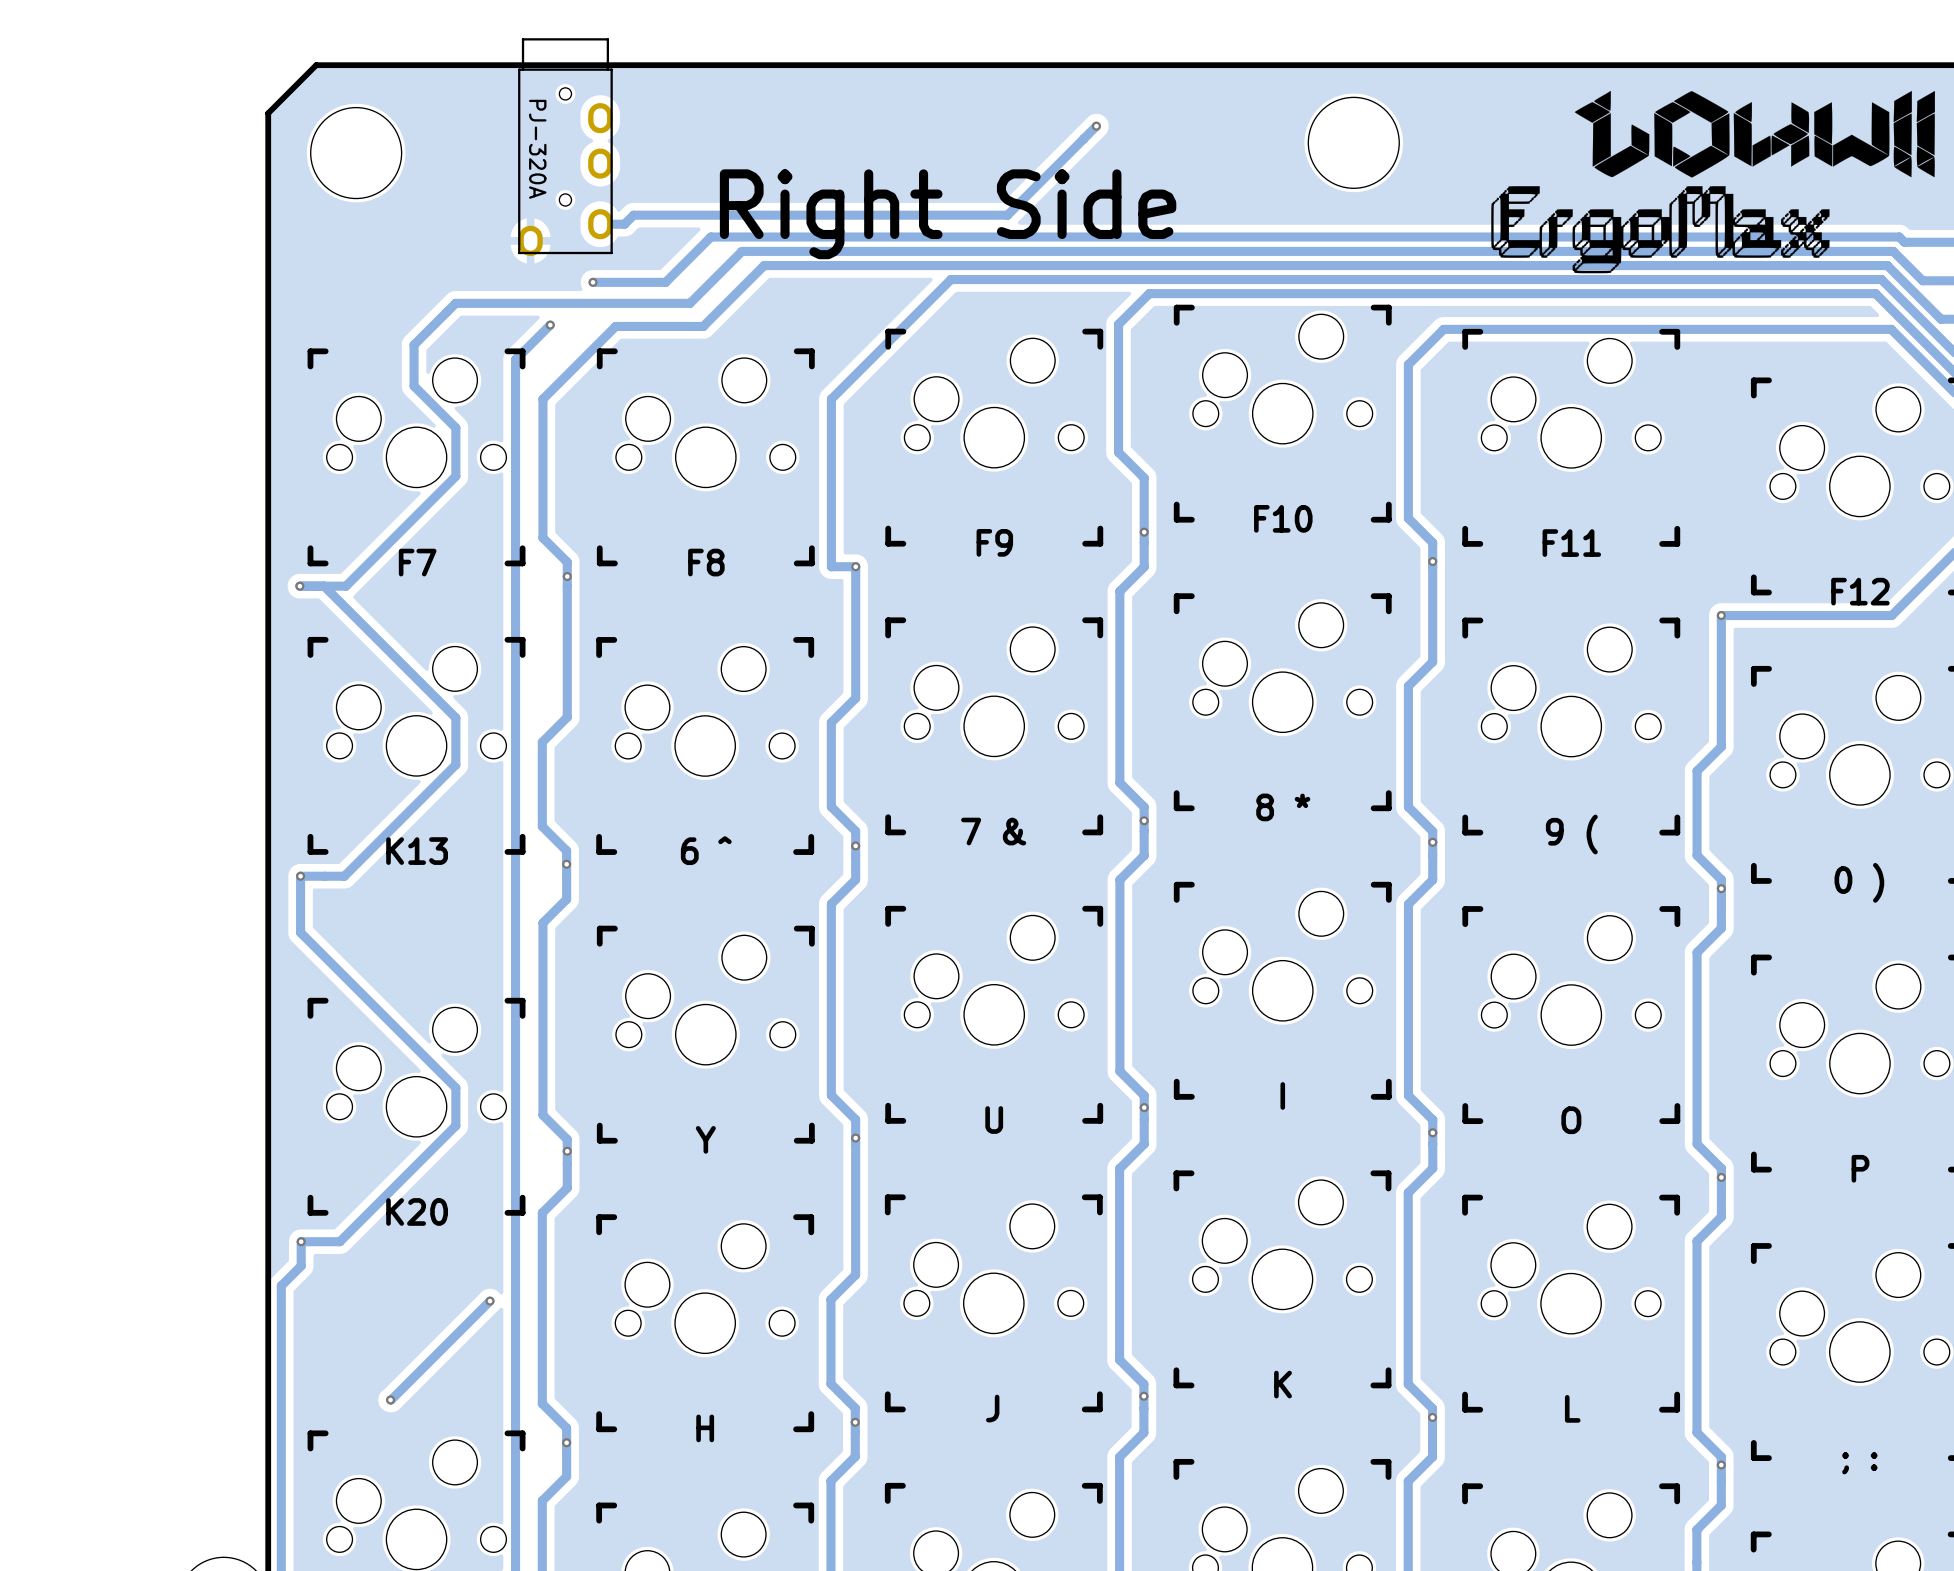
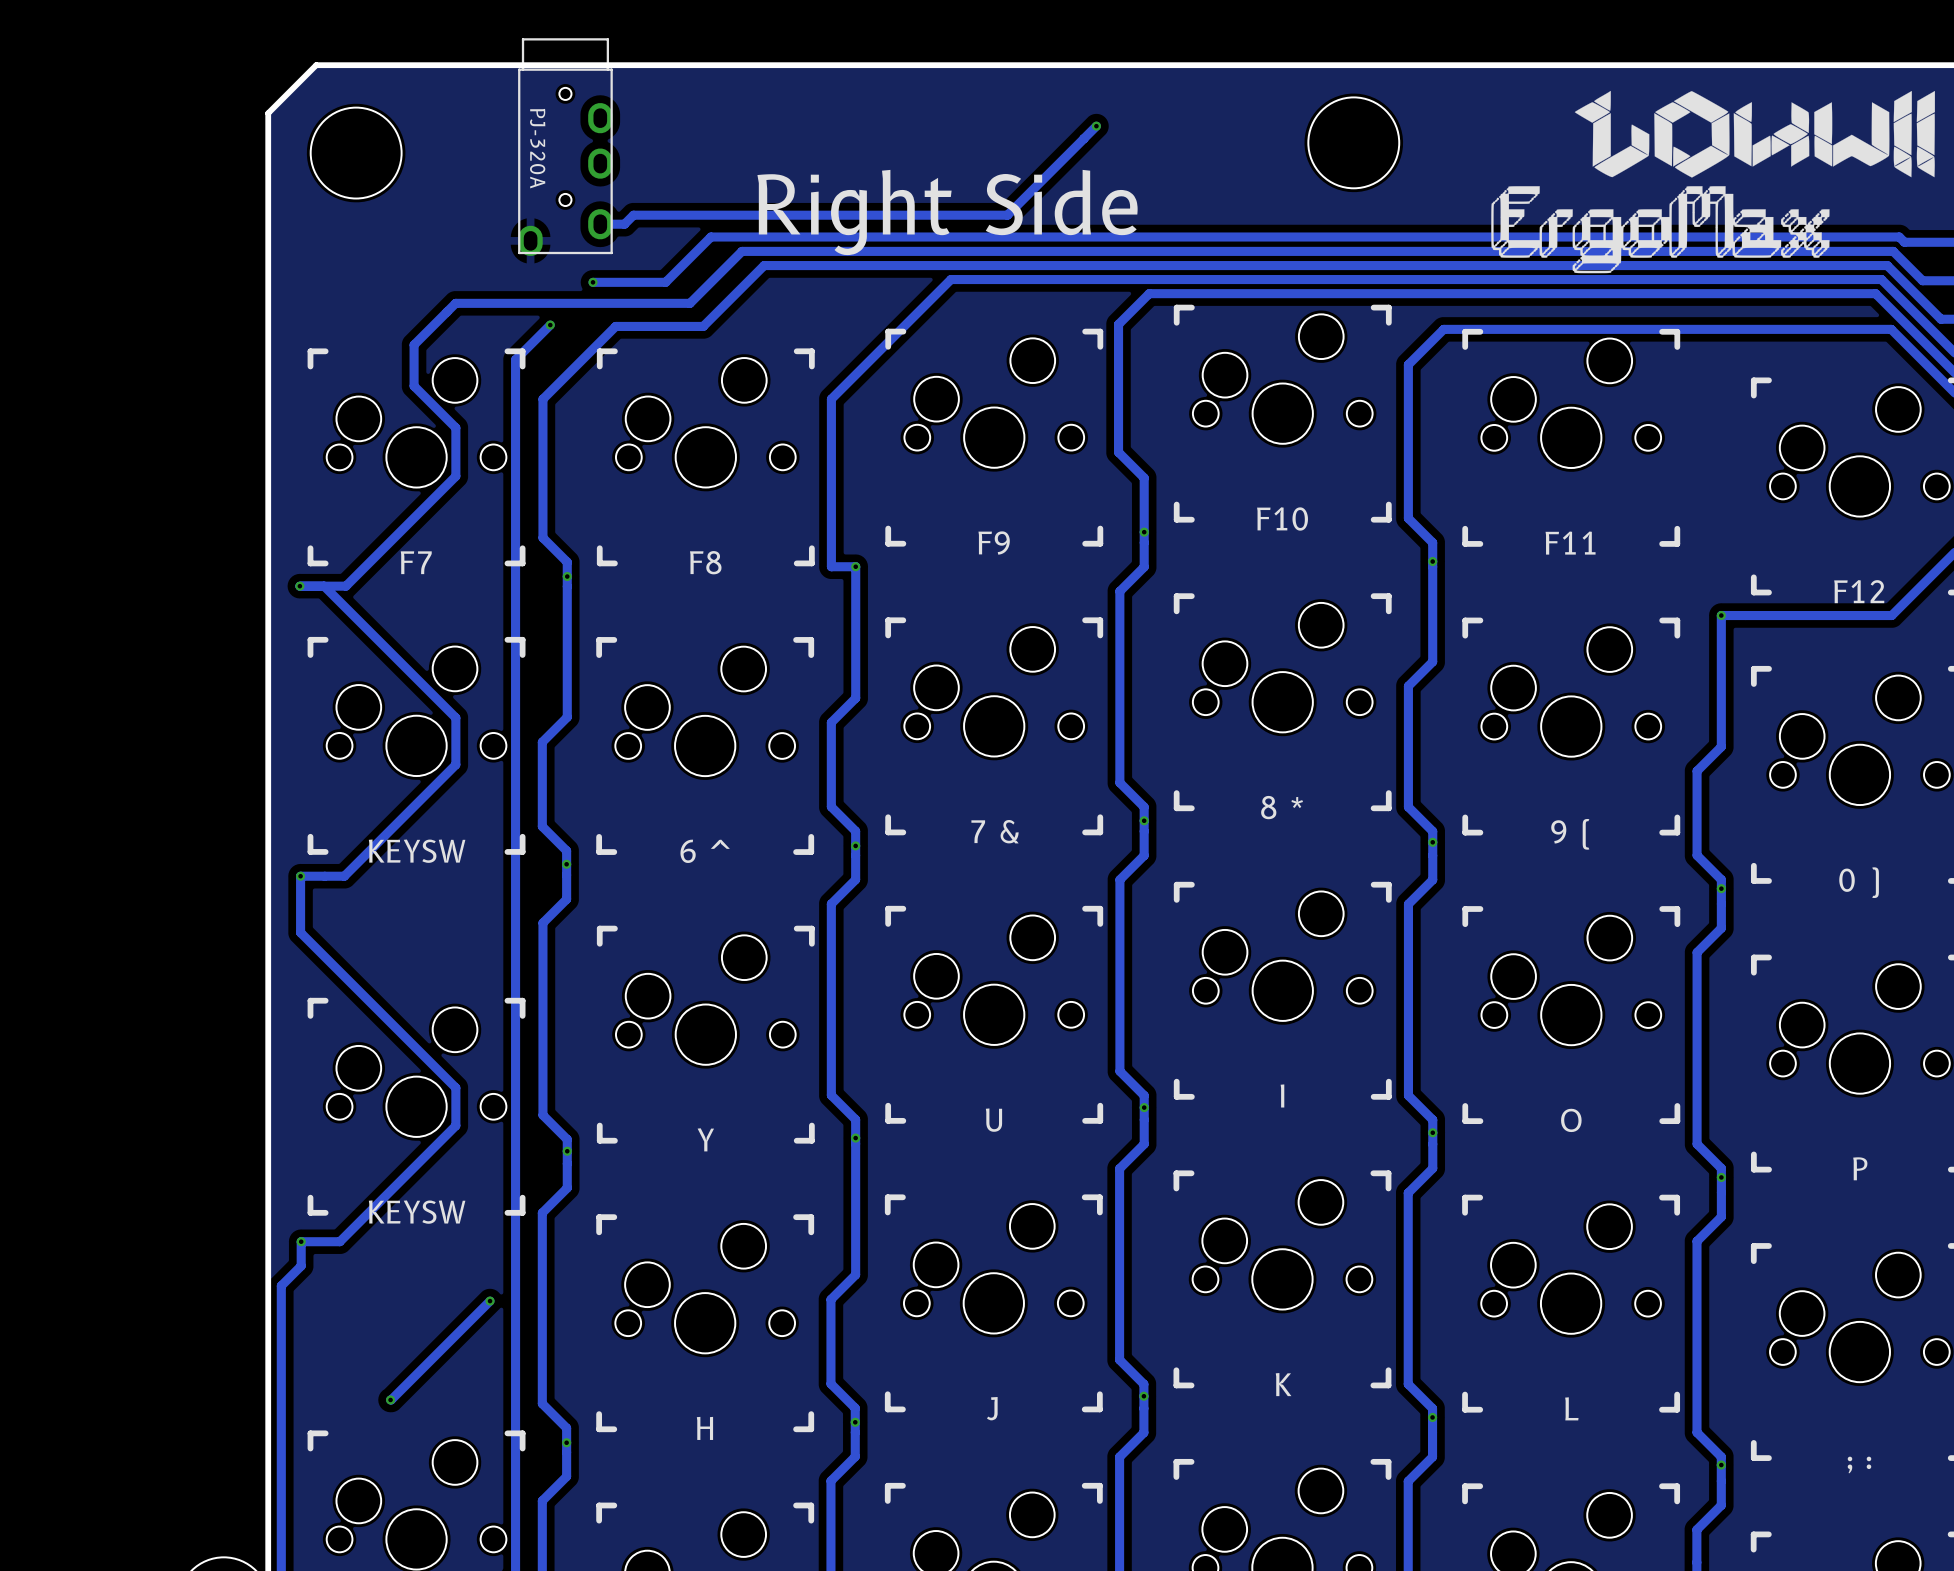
part value: K13 (417, 851) -> KEYSW (417, 851)
part value: K20 (417, 1211) -> KEYSW (417, 1212)

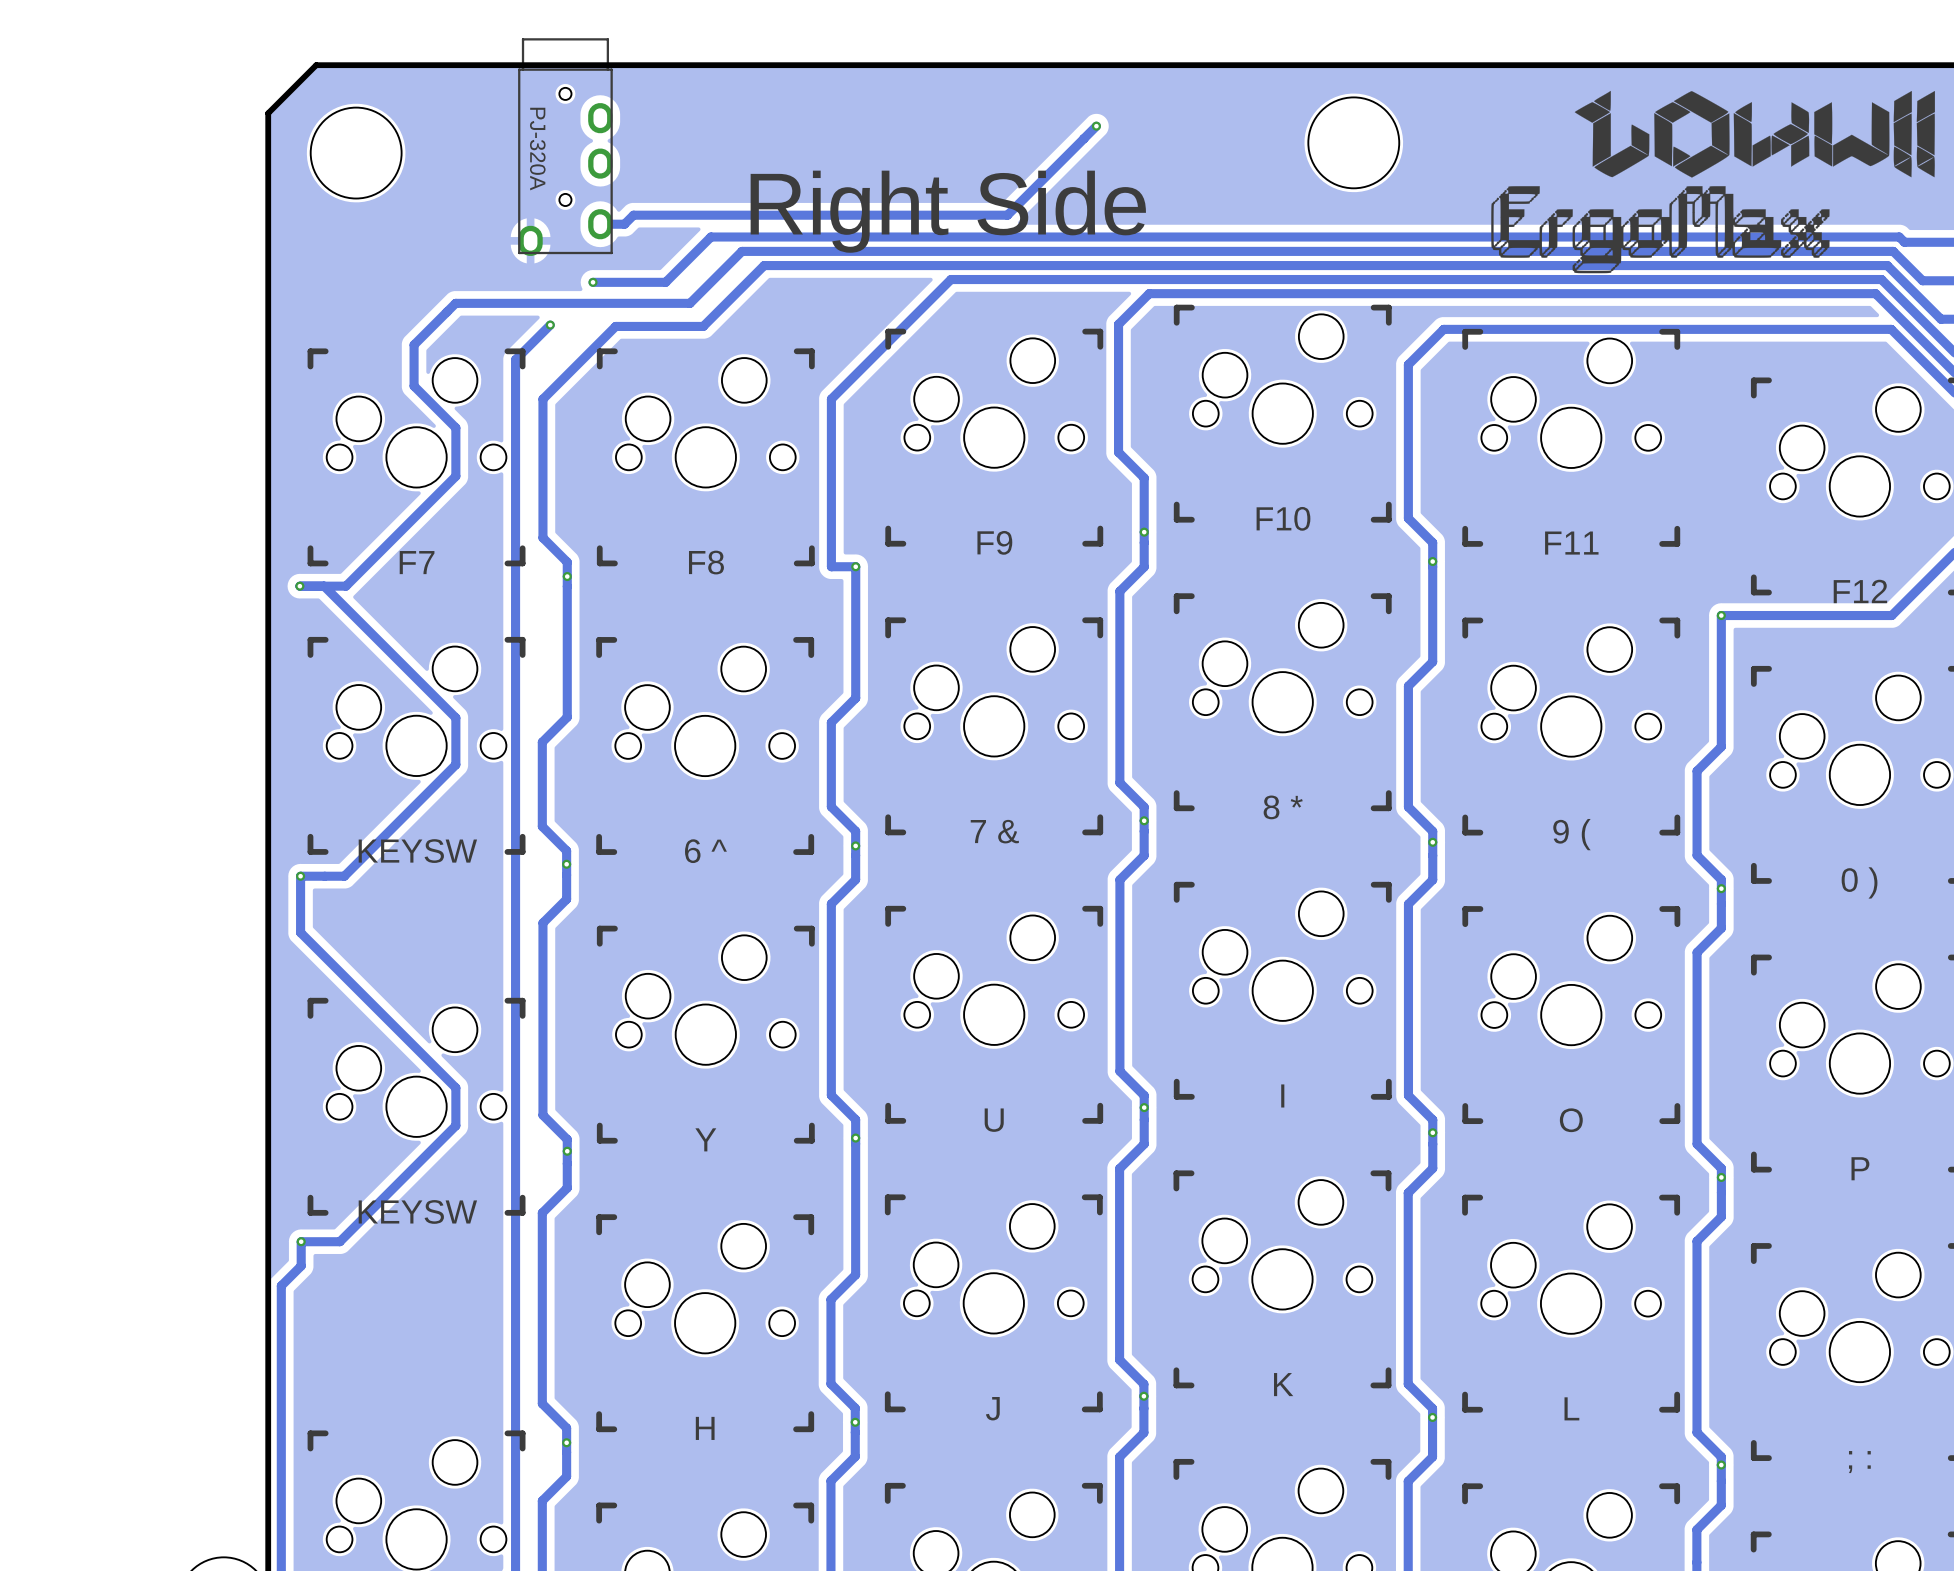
track: (490, 1301) (390, 1399) -> none
via: (490, 1301) -> none
via: (390, 1399) -> none

